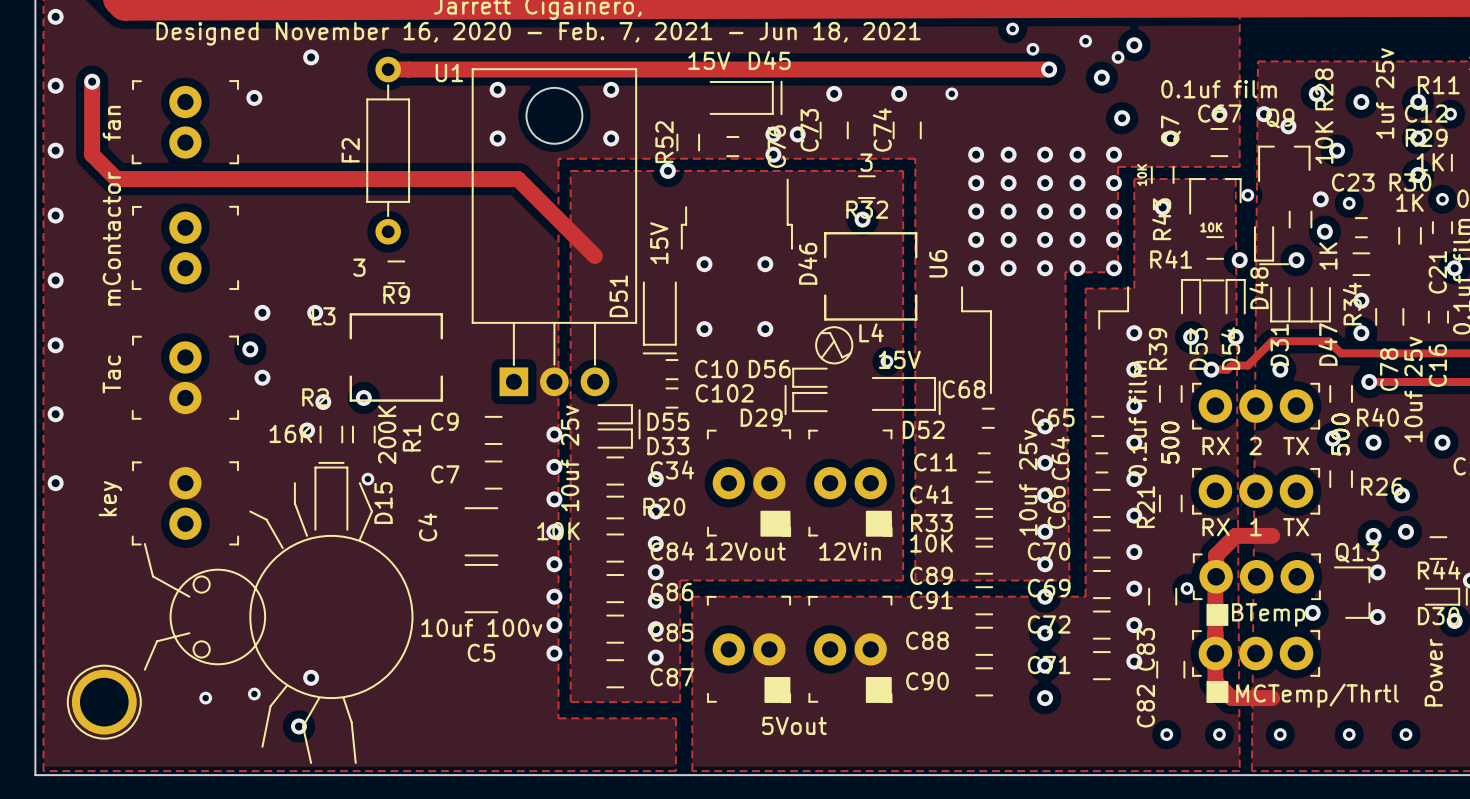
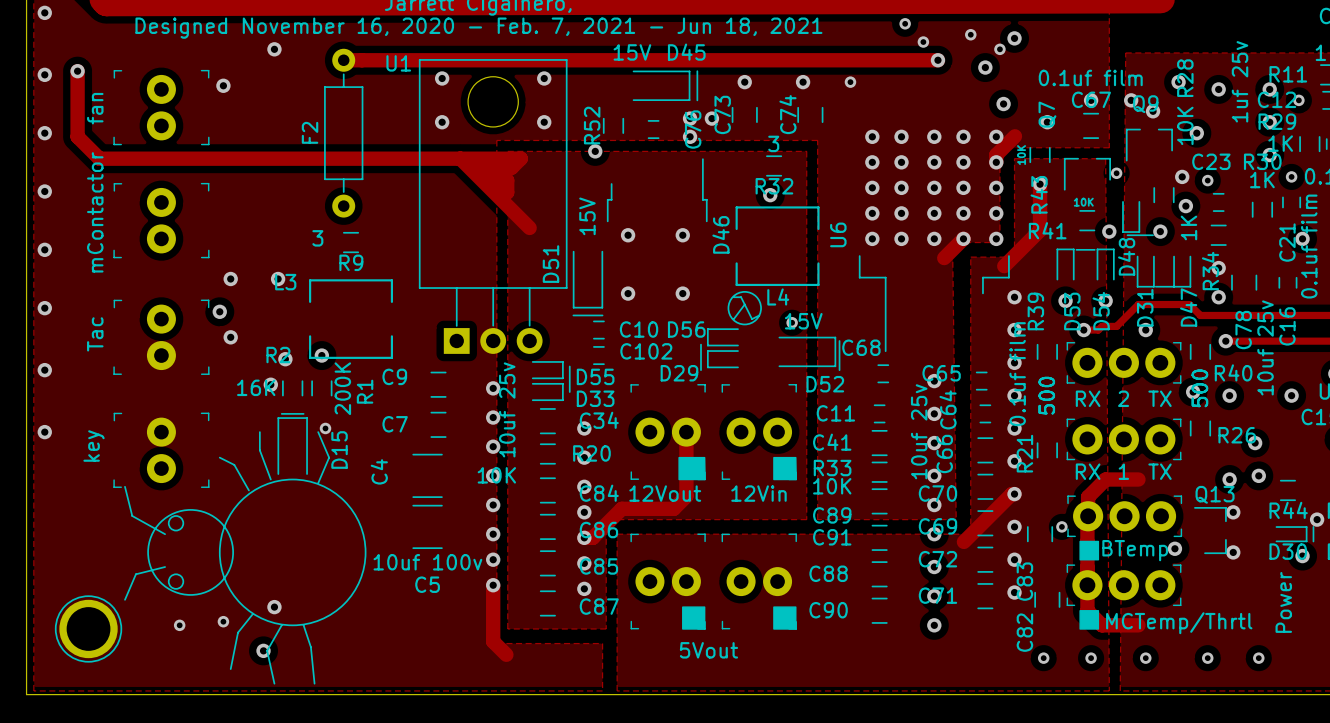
track: none -> (1014, 136) (996, 154) (996, 162)
track: none -> (460, 158) (520, 158) (511, 167) (482, 167) (507, 192) (507, 180) (502, 175)
track: none -> (1040, 184) (1040, 230) (1004, 266)
track: none -> (963, 238) (944, 258)
track: none -> (686, 432) (686, 496) (673, 508) (621, 508) (592, 537) (584, 537)
track: none -> (1014, 494) (1011, 494) (963, 541)
track: none -> (493, 585) (493, 641) (506, 654)

